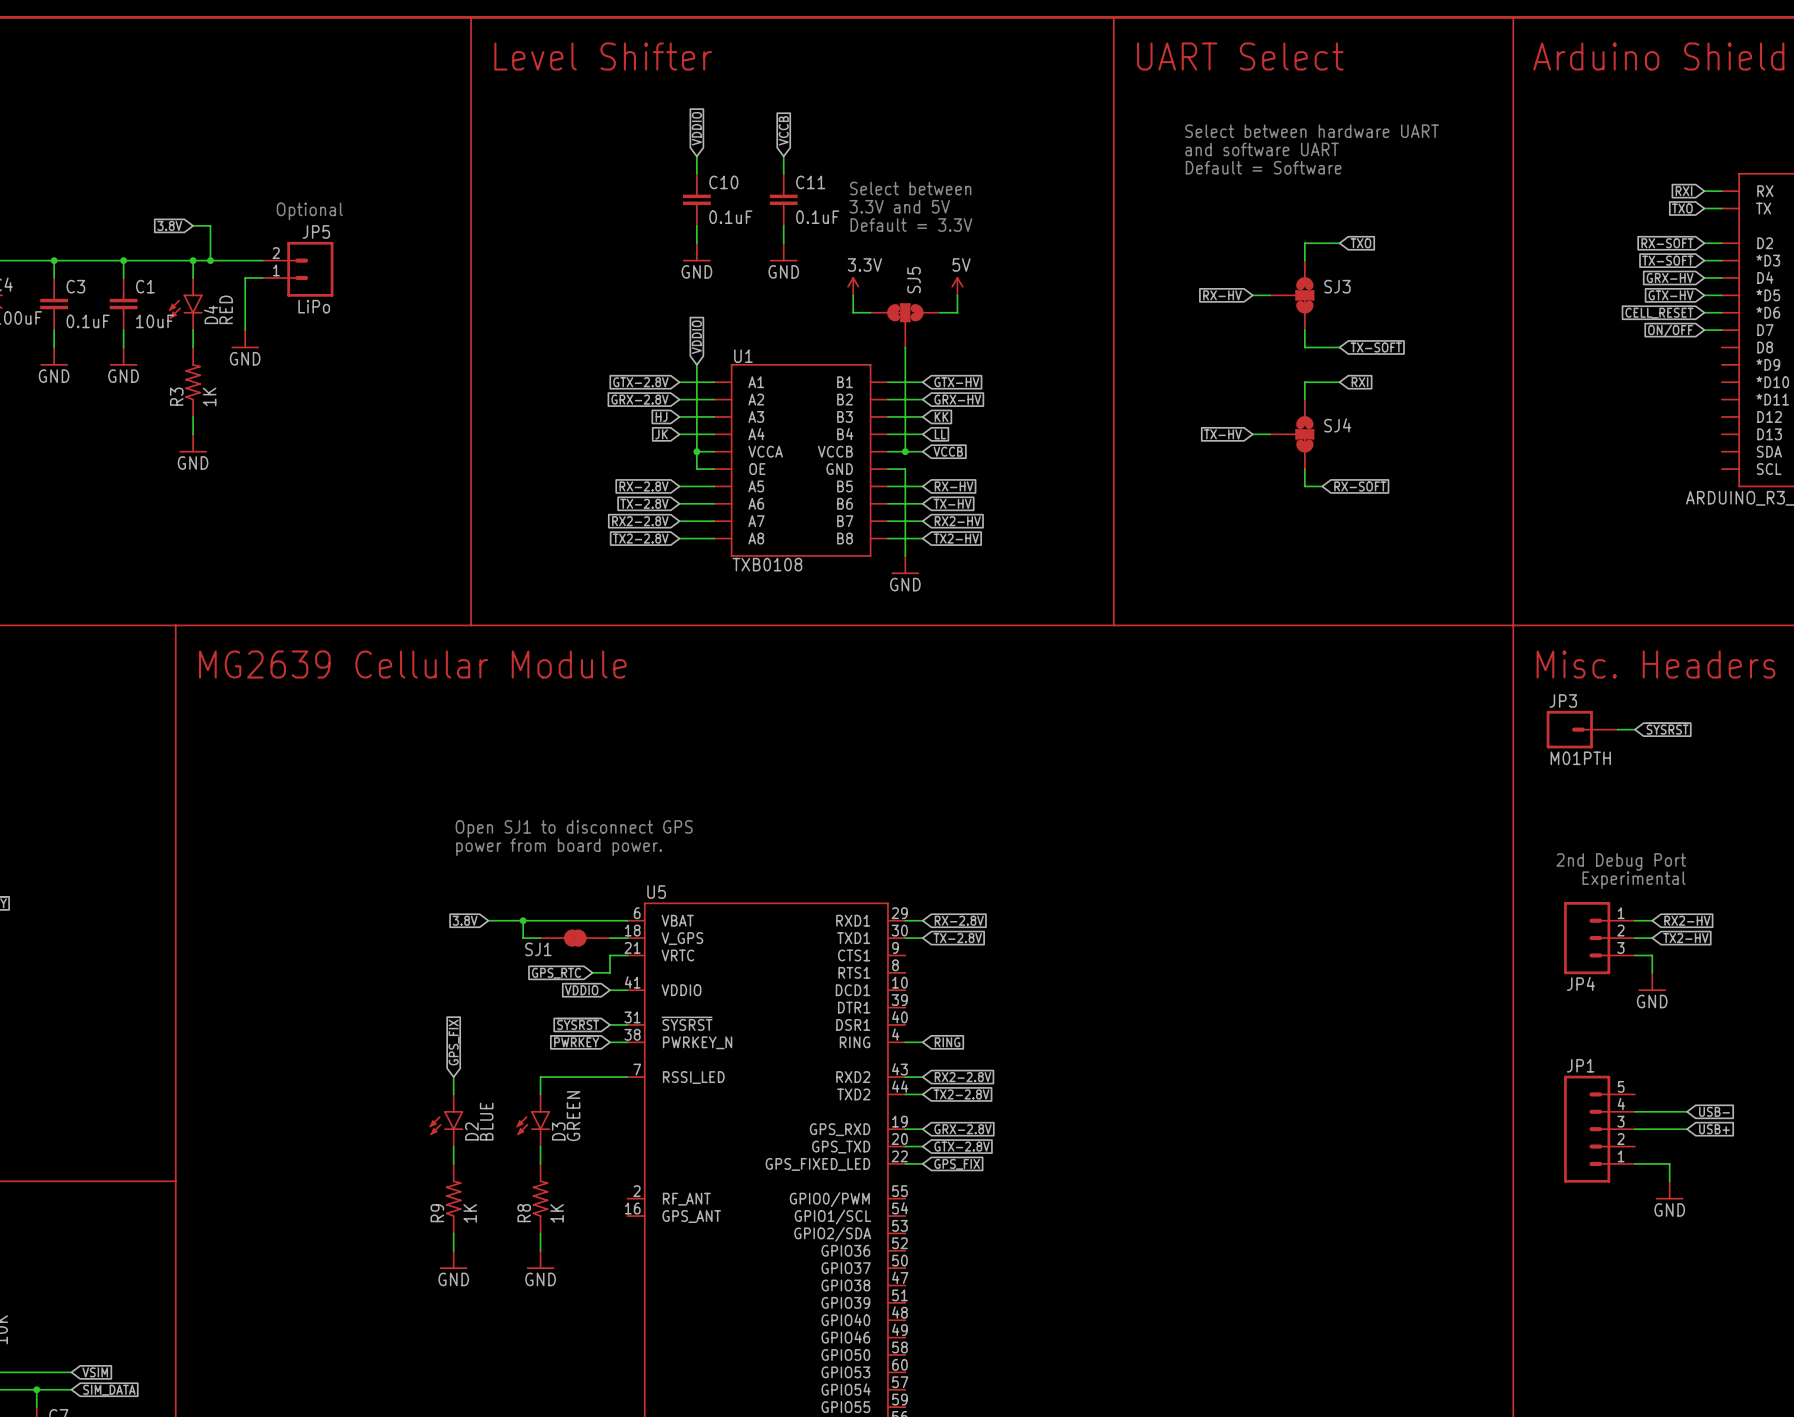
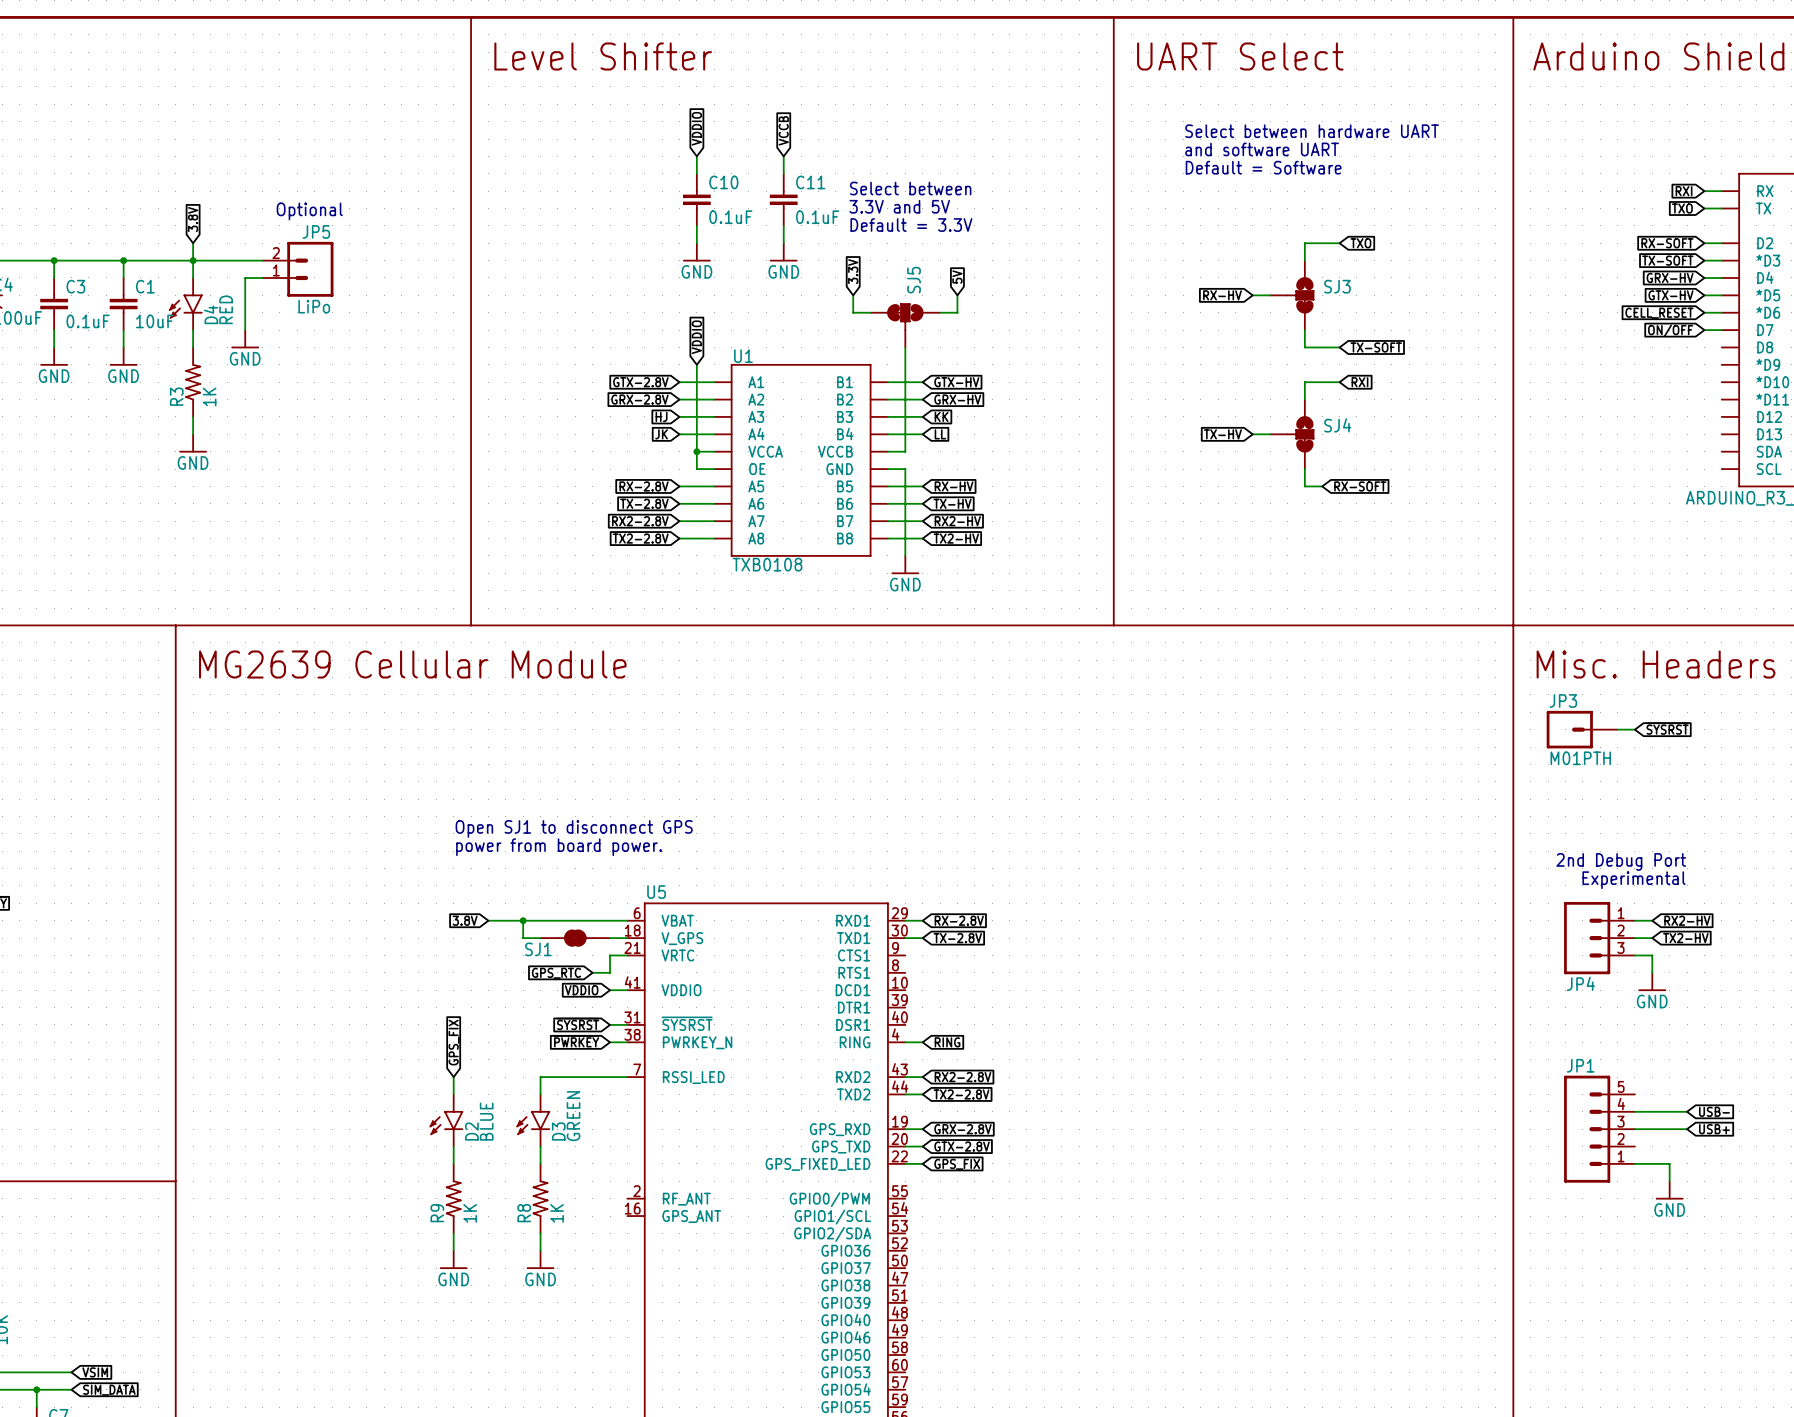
global label rotation: 0° (169, 225) -> 90° clockwise (193, 219)
wire: (193, 225) (210, 225) (210, 260) -> none
wire: none -> (193, 243) (193, 260)
junction: (210, 260) -> none
global label: none -> 3.3V (853, 271)
global label: none -> 5V (957, 277)
power symbol: 3.3V (853, 286) -> none
power symbol: 5V (957, 286) -> none
wire: (905, 451) (922, 451) -> none
junction: (905, 451) -> none
global label: VCCB (948, 451) -> none

